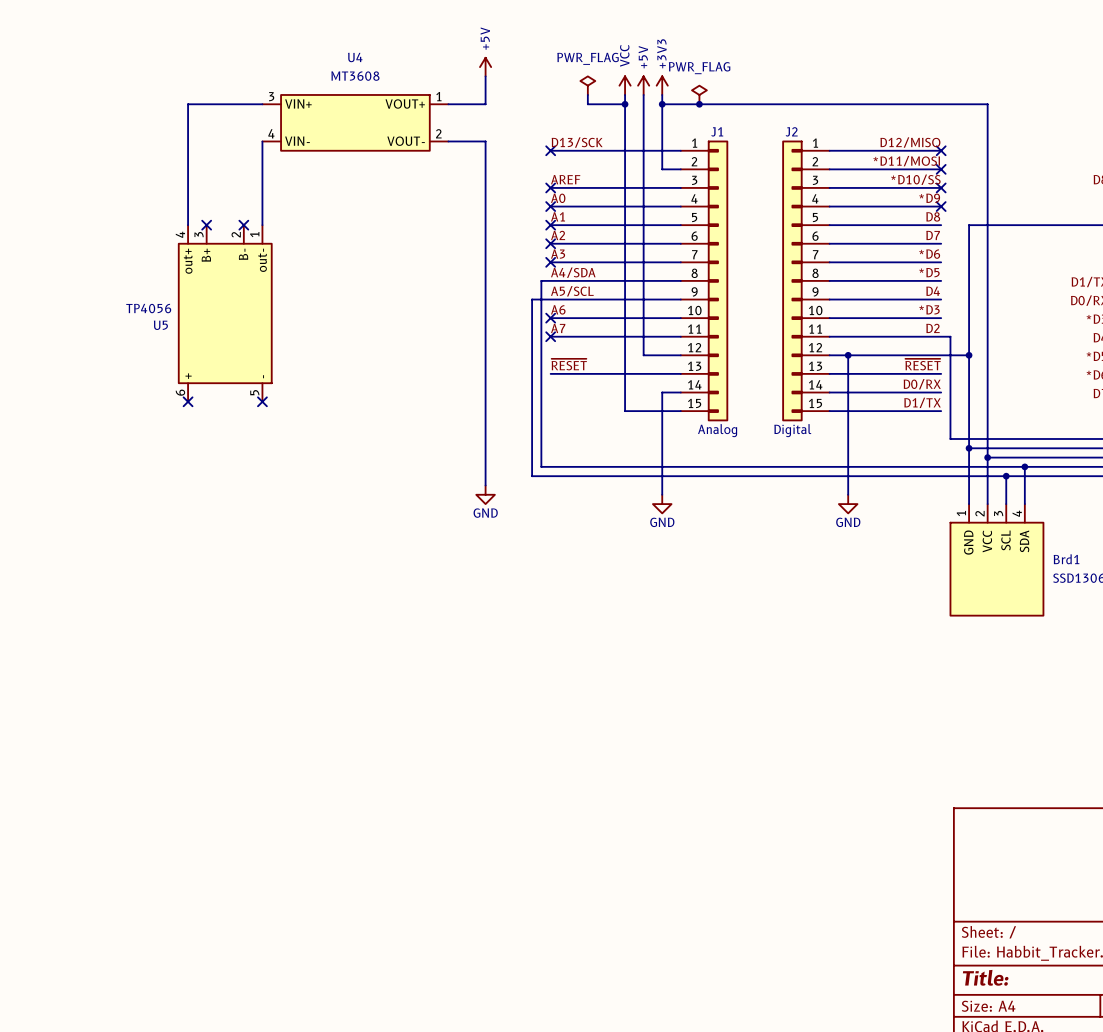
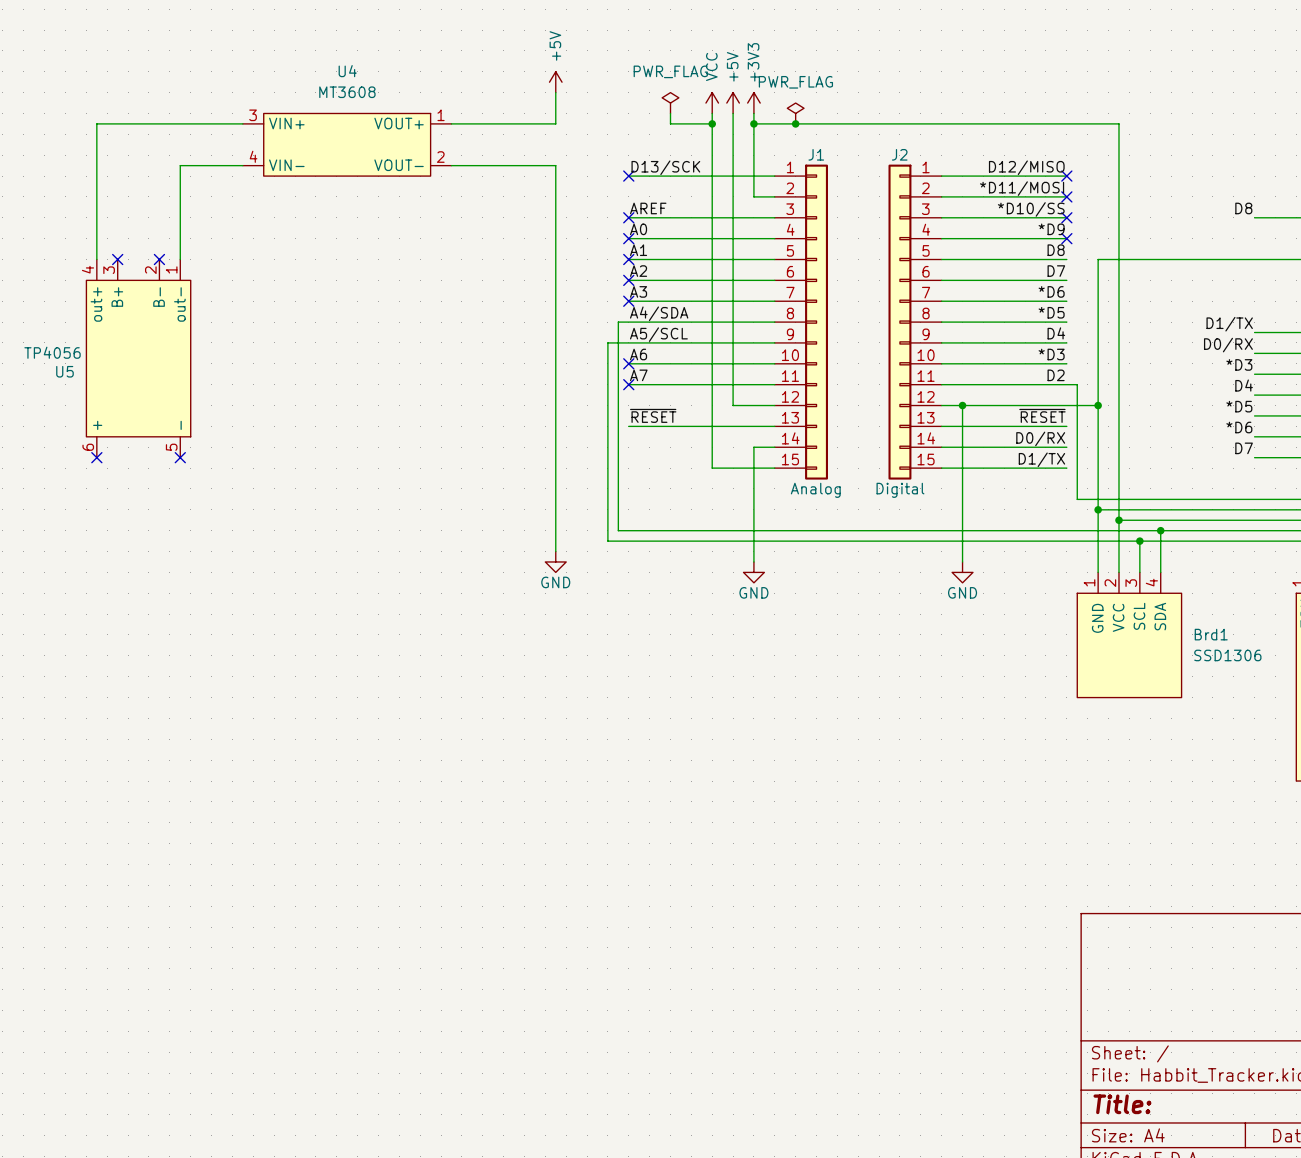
wire: (188, 104) (188, 225) -> (222, 123) (96, 123) (96, 259)
U4 position: (355, 122) -> (347, 144)
wire: none -> (242, 165) (180, 165) (180, 259)
wire: (262, 141) (262, 225) -> none
no-connect mark: none -> (117, 259)
no-connect mark: none -> (159, 259)
no-connect mark: (206, 225) -> none
no-connect mark: (243, 225) -> none
U5 position: (225, 313) -> (138, 358)
no-connect mark: none -> (96, 457)
no-connect mark position: (188, 401) -> (180, 457)
no-connect mark: (262, 401) -> none

